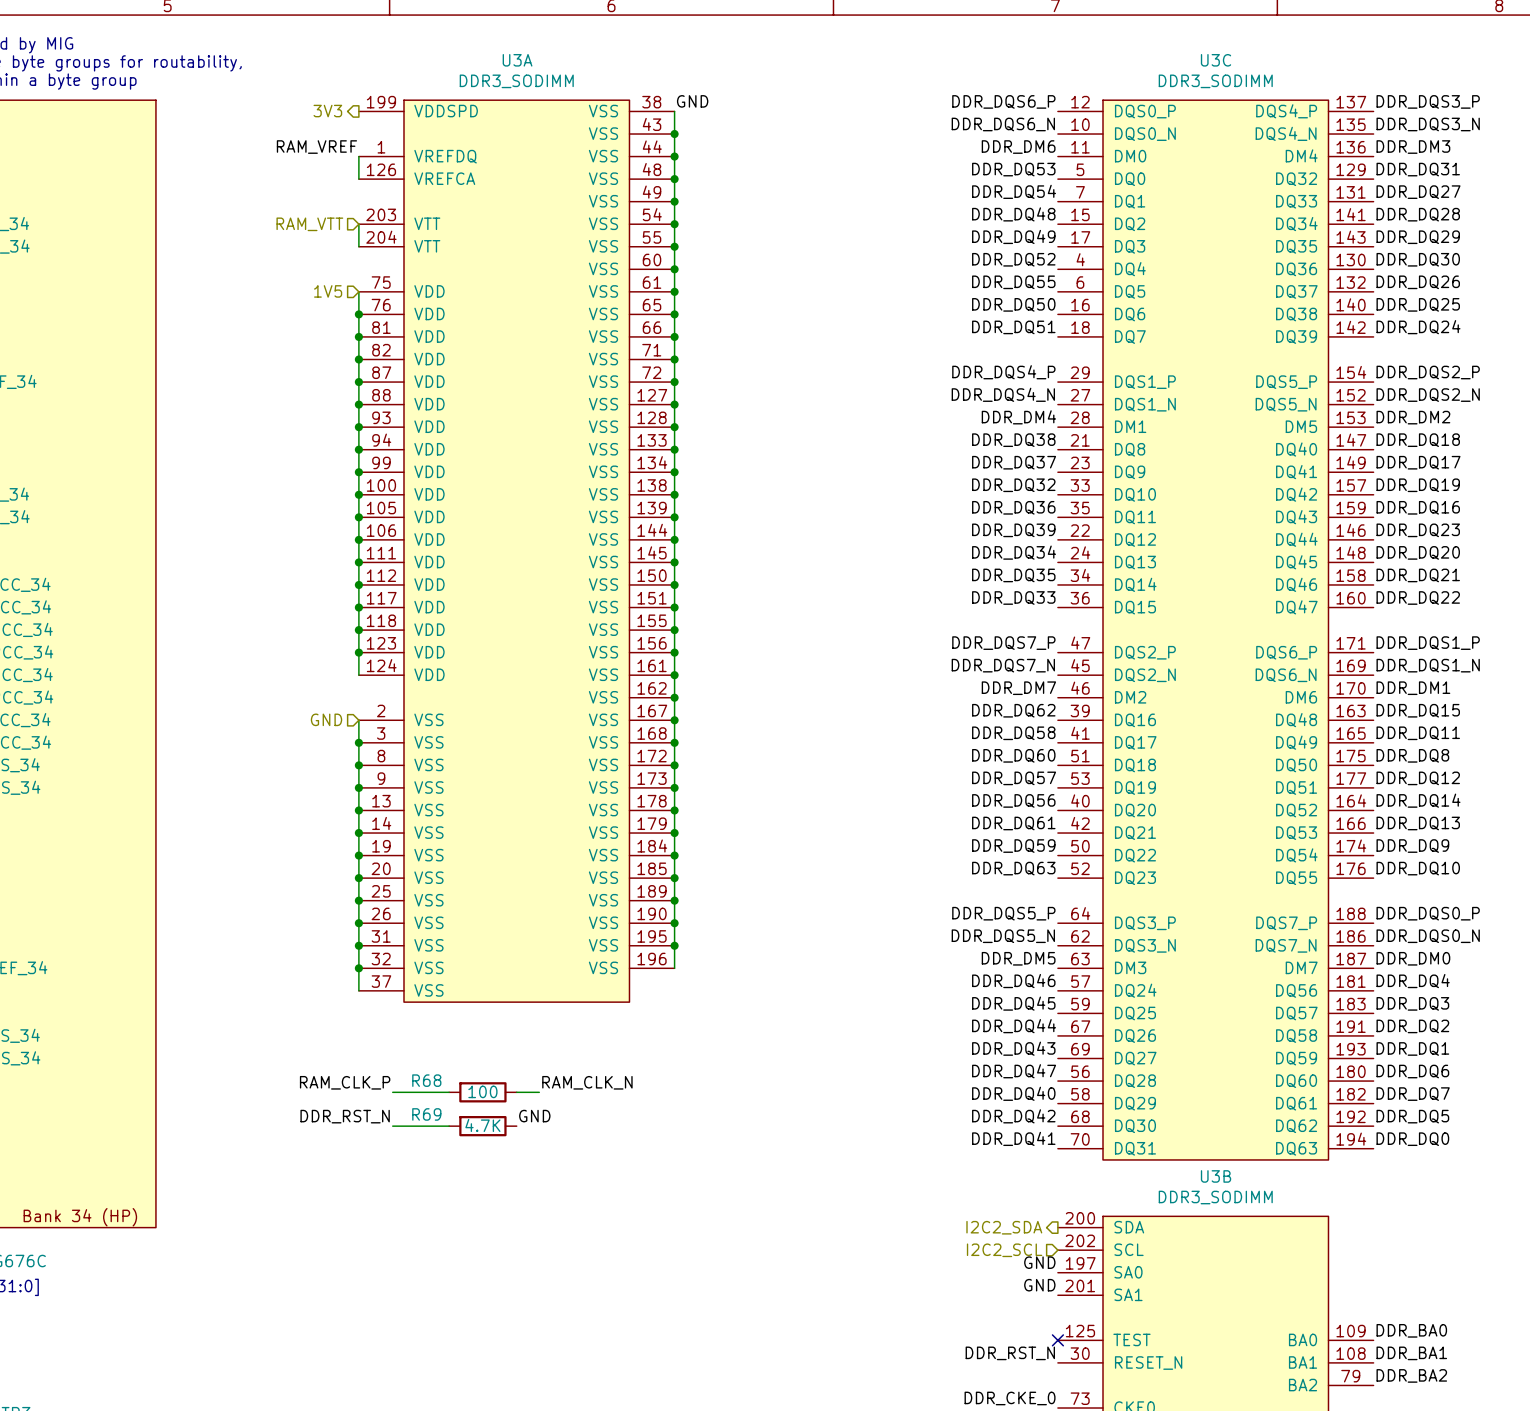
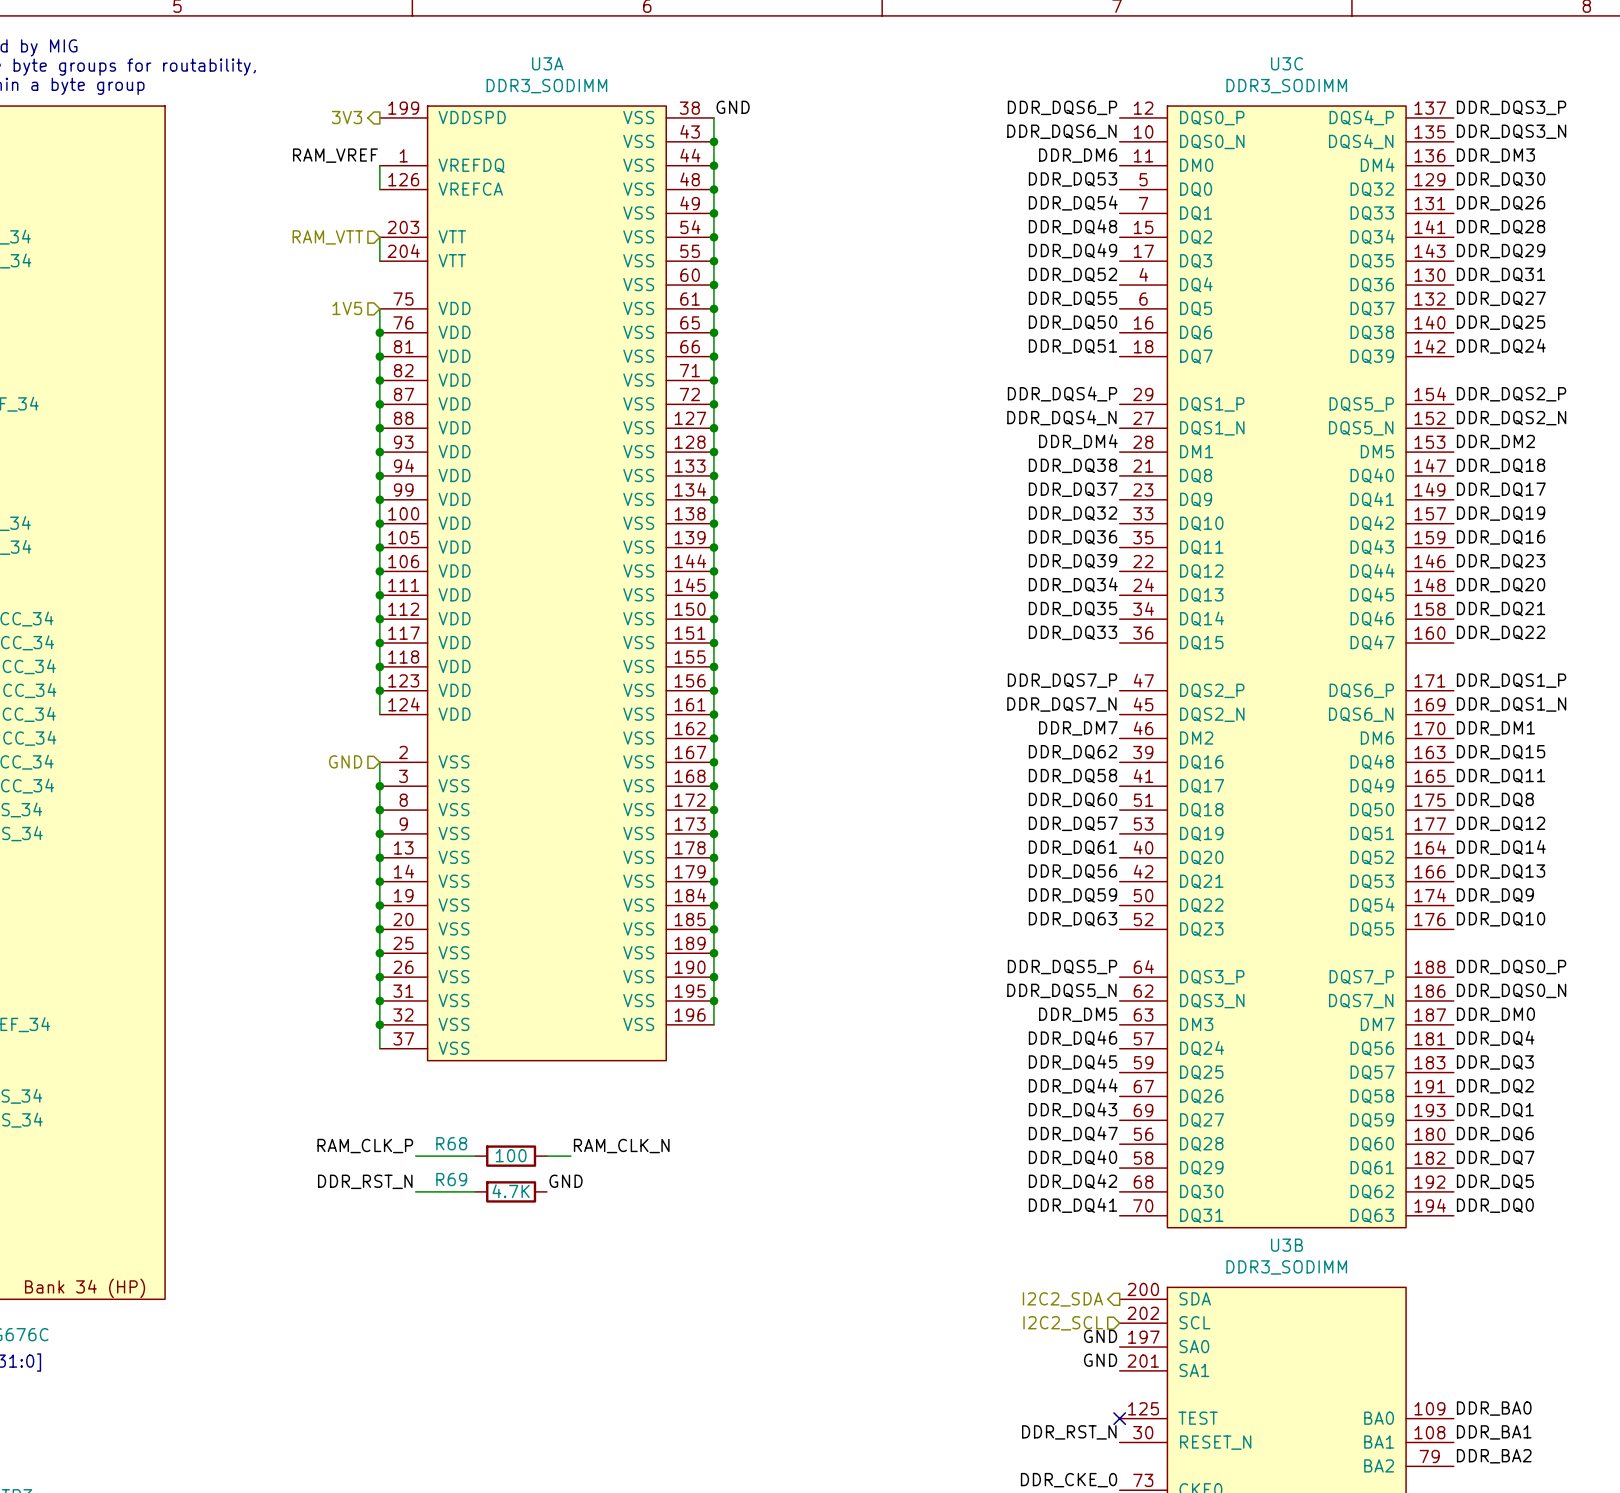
label: DDR_DQ31 (1418, 169) -> DDR_DQ30 (1501, 179)
label: DDR_DQ27 (1418, 192) -> DDR_DQ26 (1501, 203)
label: DDR_DQ30 (1418, 259) -> DDR_DQ31 (1501, 274)
label: DDR_DQ26 (1418, 282) -> DDR_DQ27 (1501, 298)
label: DDR_DQ56 (1013, 800) -> DDR_DQ61 (1072, 847)
label: DDR_DQ61 (1013, 823) -> DDR_DQ56 (1072, 871)

